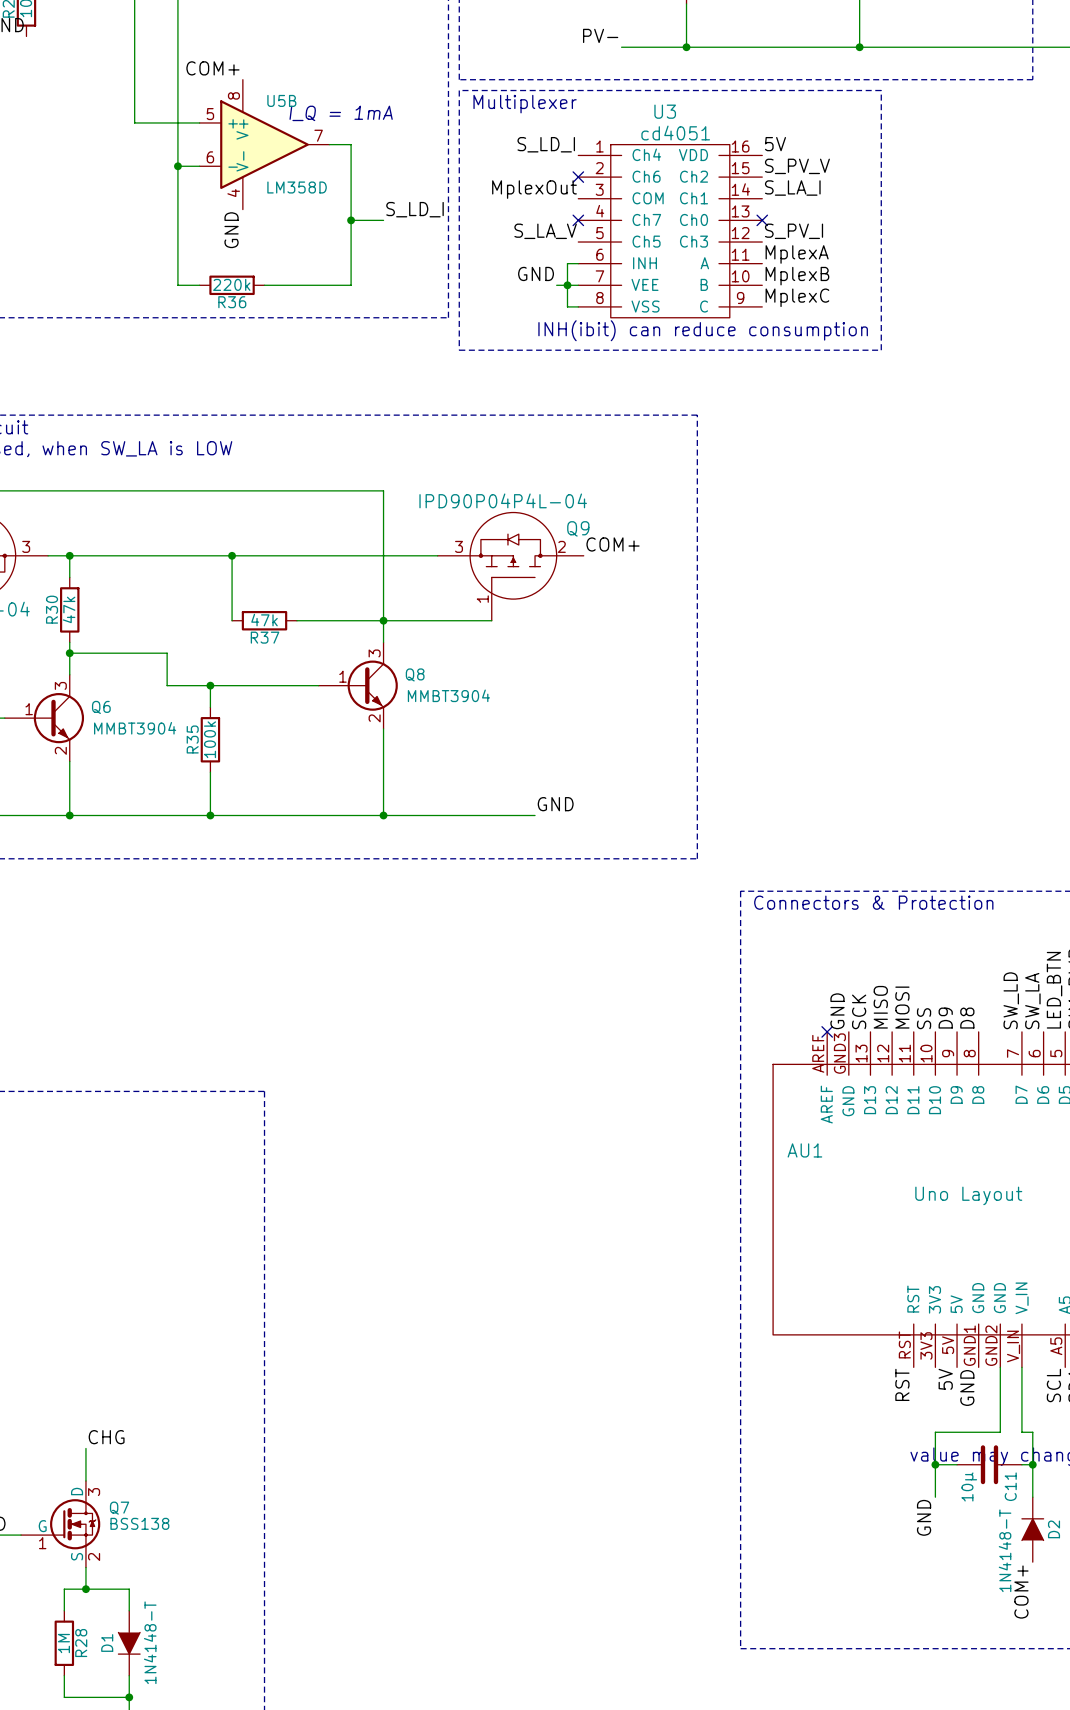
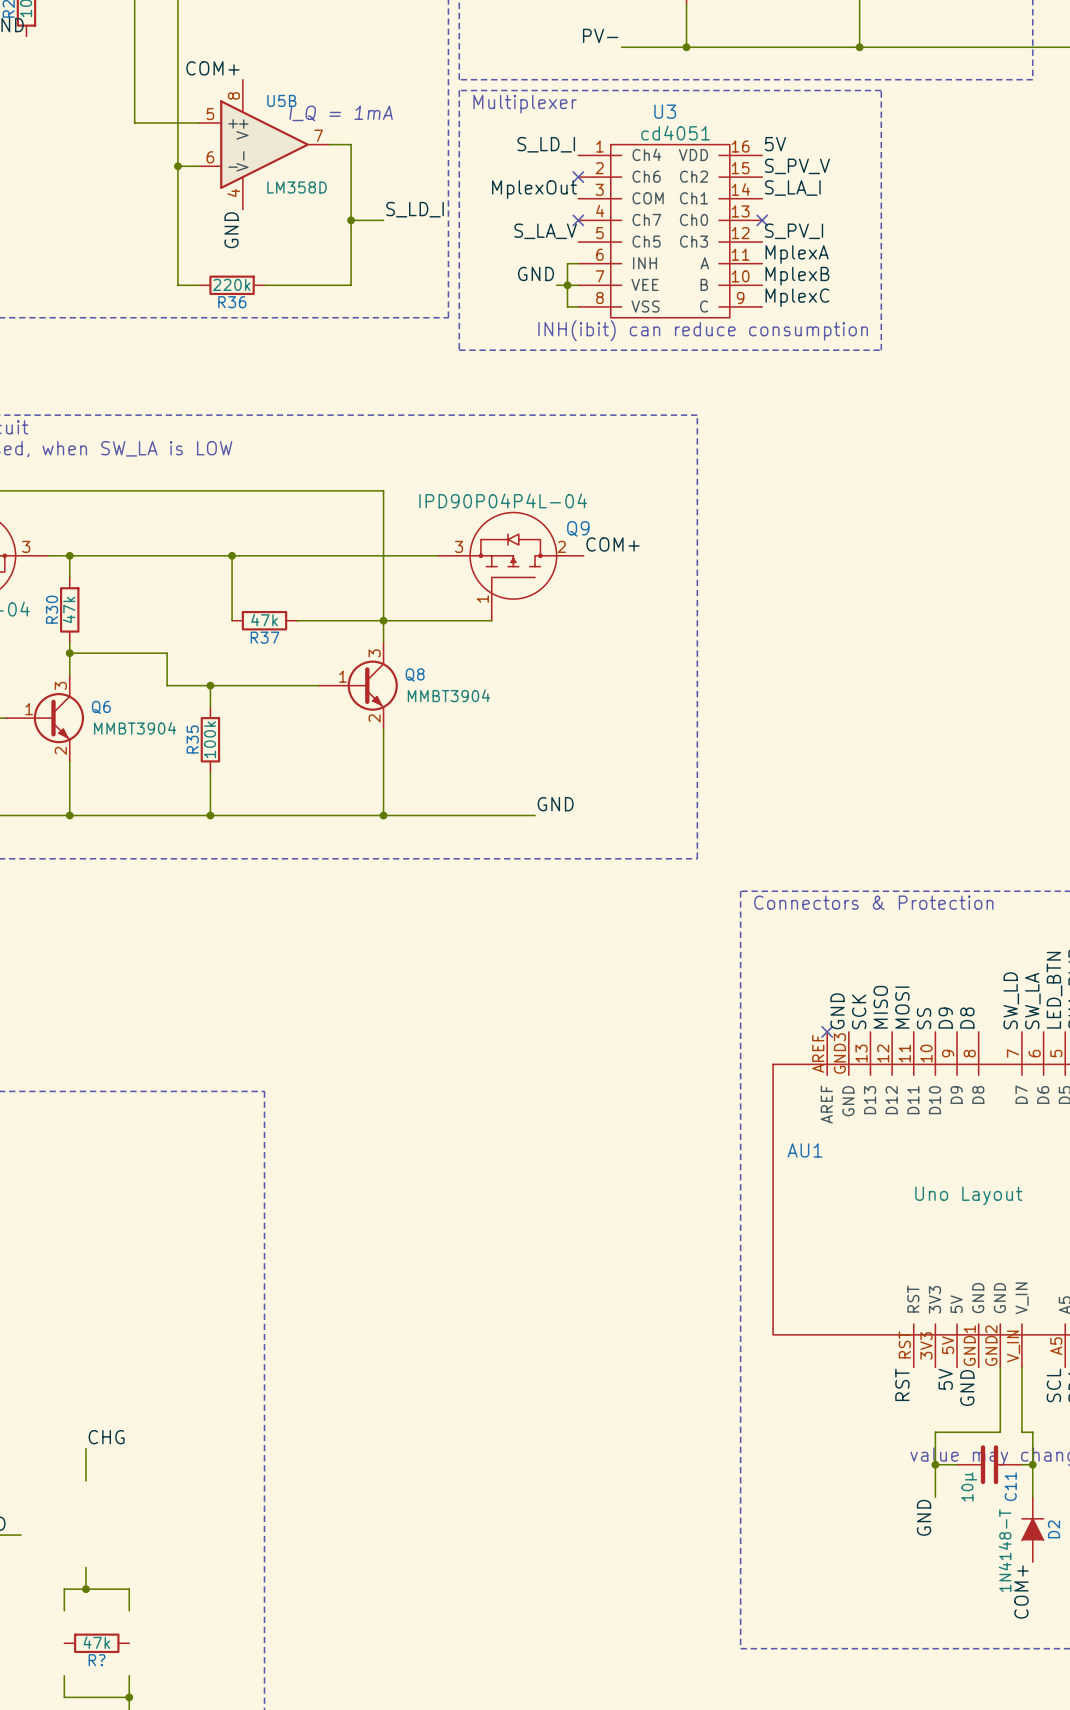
Q7: BSS138 (60, 1524) -> none
R28: 1M (64, 1643) -> none
R?: none -> 47k (96, 1643)
D1: 1N4148-T (129, 1643) -> none

